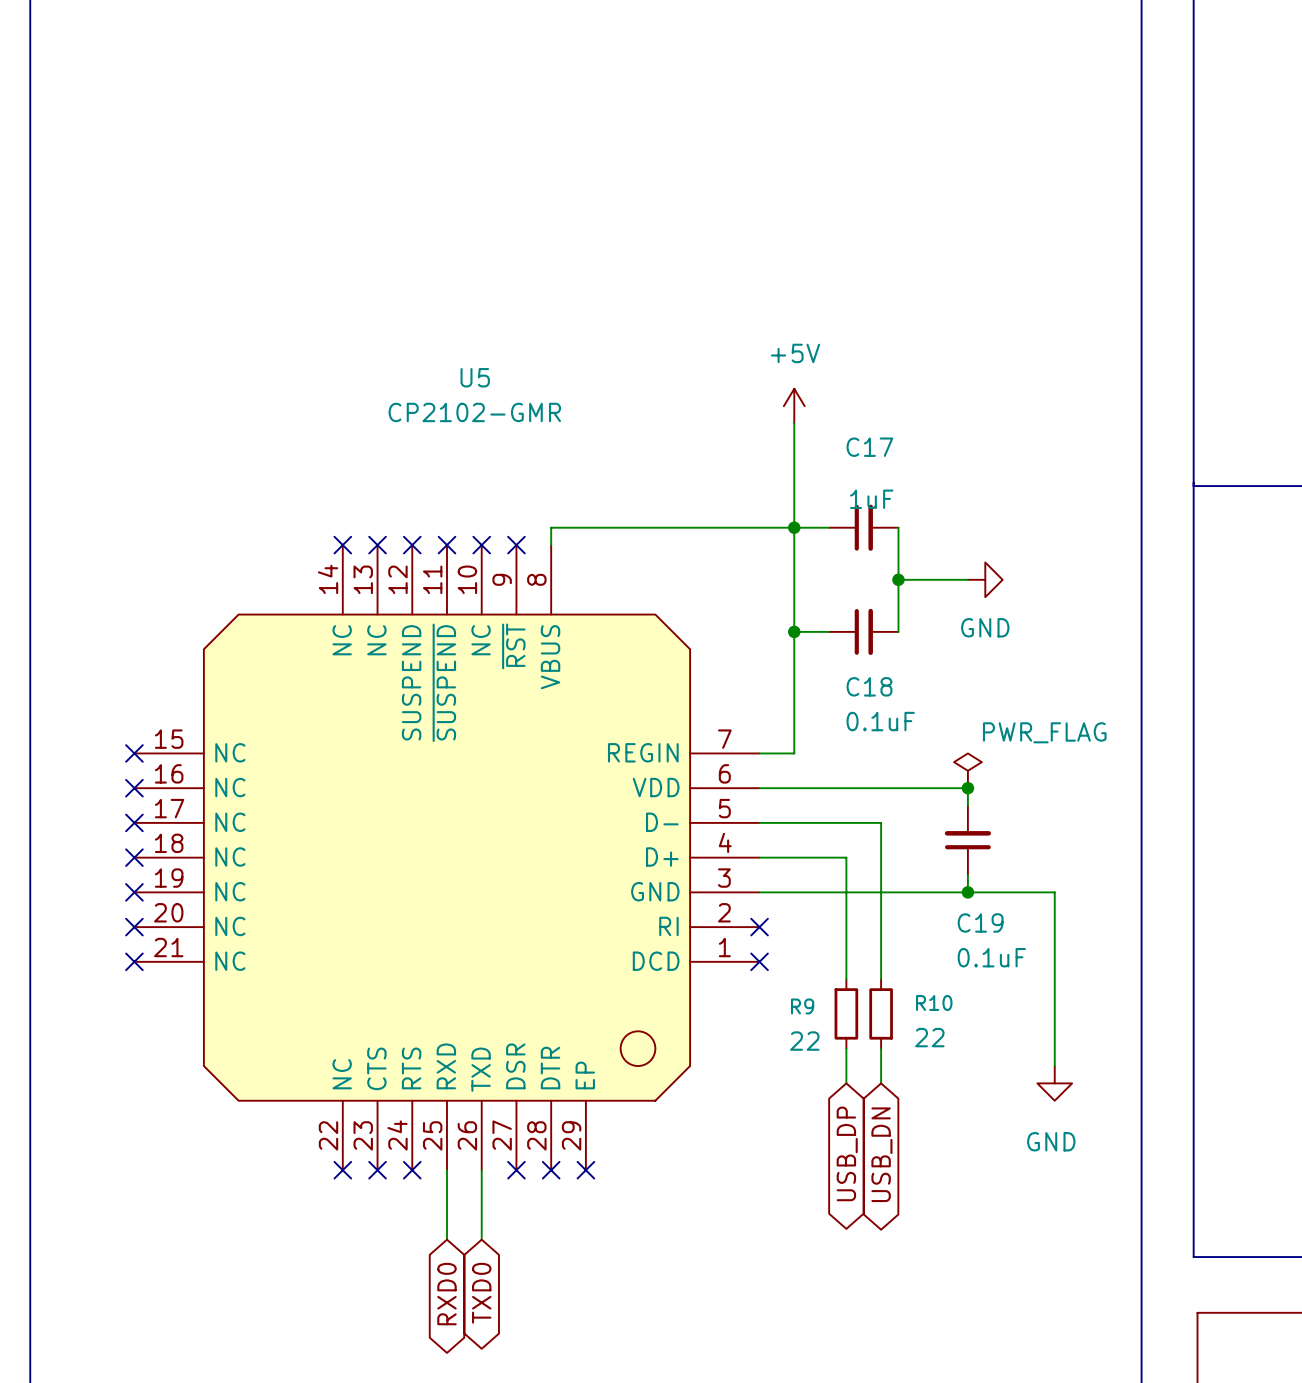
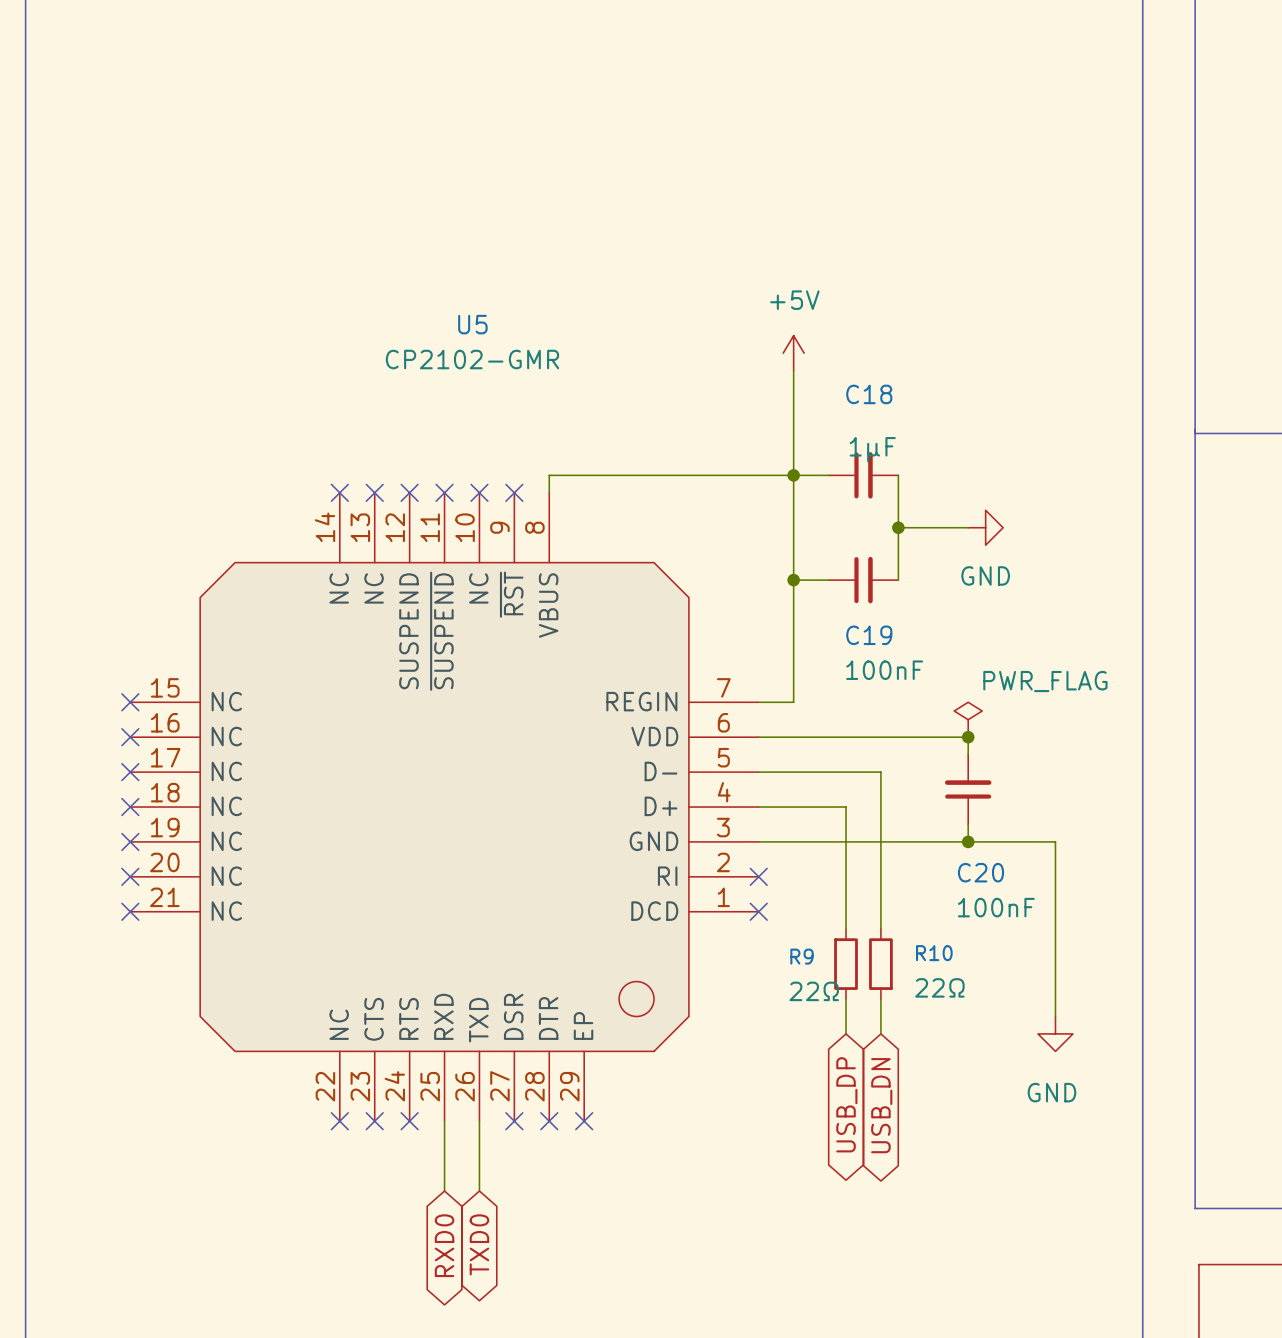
C17 name: C17 (869, 447) -> C18 (869, 394)
C17 value: 1uF (871, 499) -> 1μF (872, 449)
C18 name: C18 (869, 686) -> C19 (869, 635)
C18 value: 0.1uF (880, 721) -> 100nF (884, 670)
C19 name: C19 (980, 922) -> C20 (980, 872)
C19 value: 0.1uF (991, 957) -> 100nF (996, 907)
R10 value: 22 (929, 1037) -> 22Ω (939, 987)
R9 value: 22 (804, 1041) -> 22Ω (814, 991)

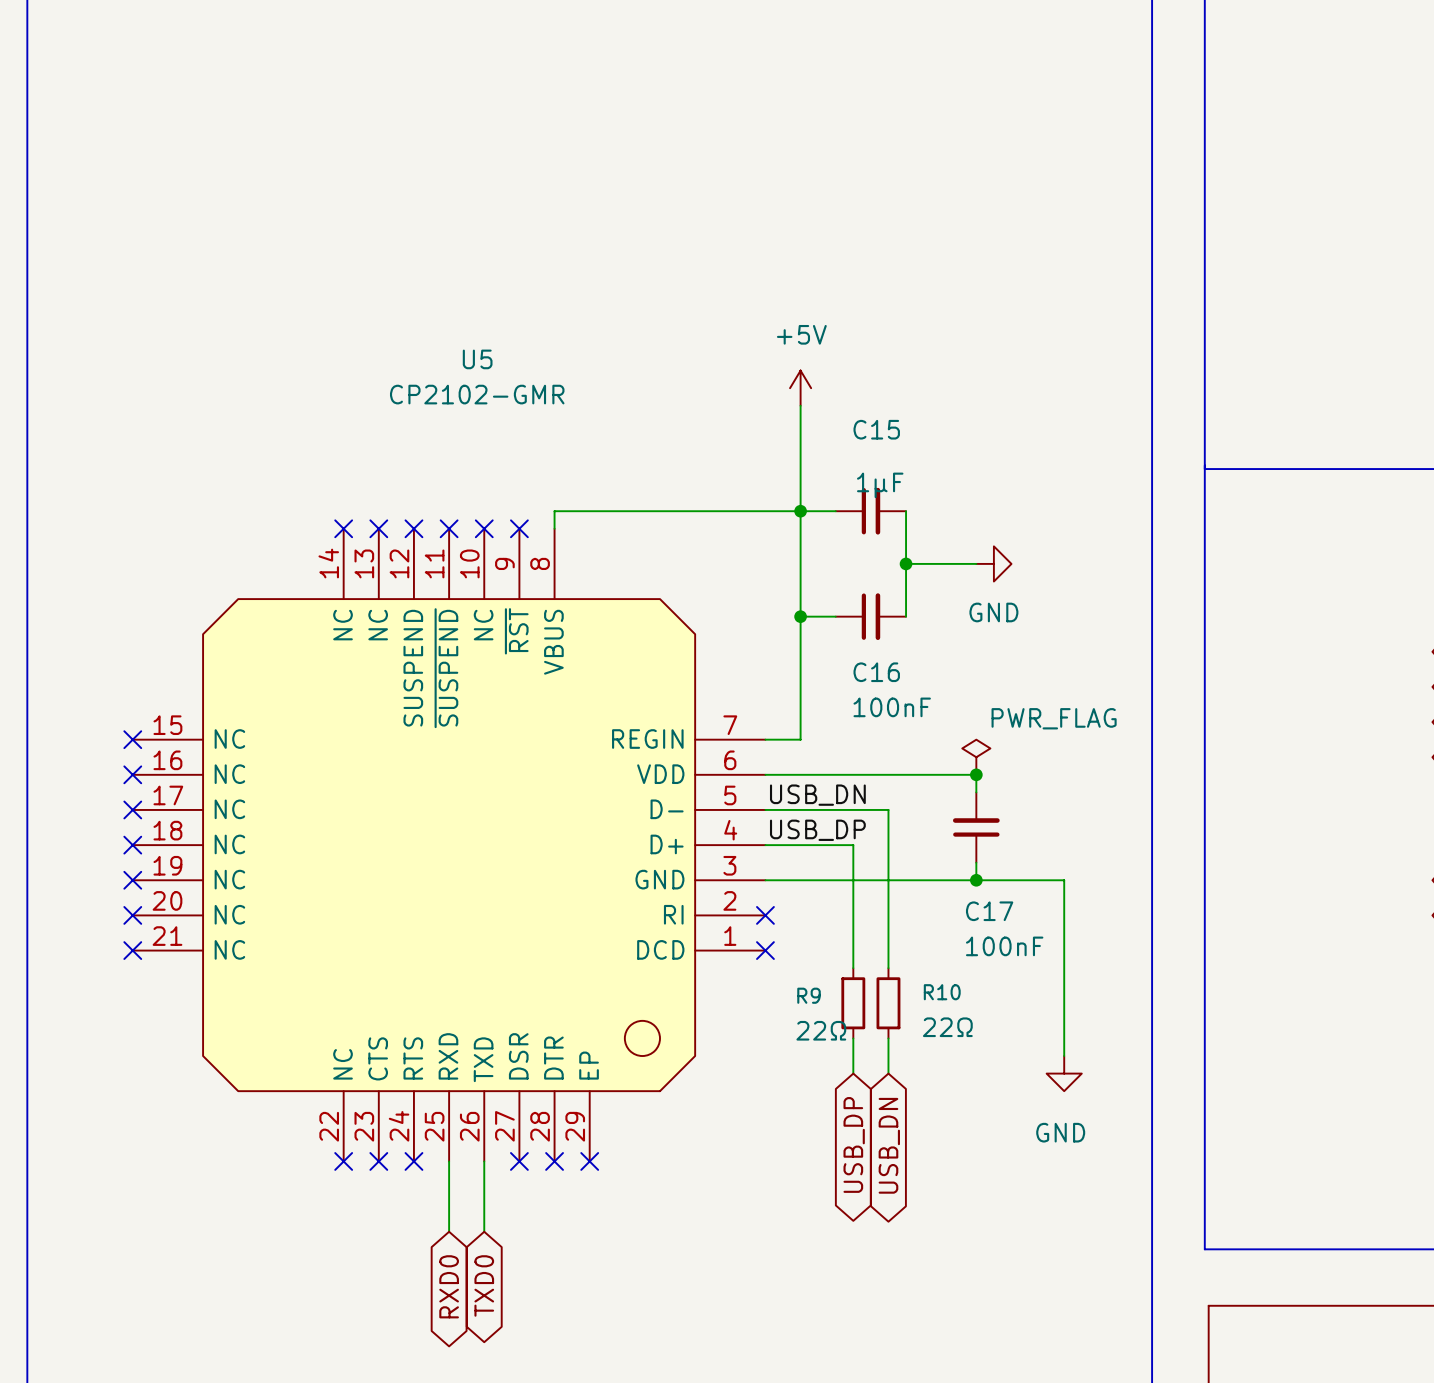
C18 name: C18 (869, 394) -> C15 (876, 429)
C19 name: C19 (869, 635) -> C16 (876, 672)
label: none -> USB_DN (817, 795)
label: none -> USB_DP (817, 830)
C20 name: C20 (980, 872) -> C17 (989, 911)

